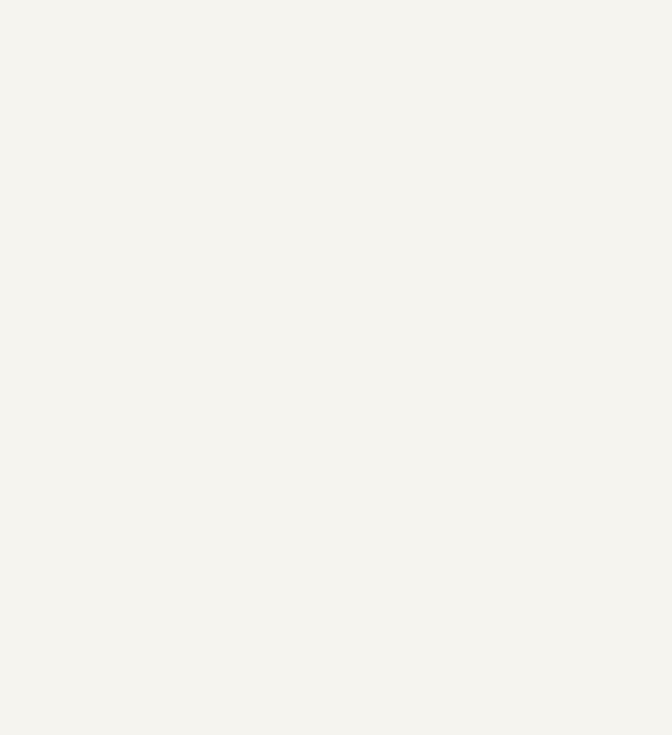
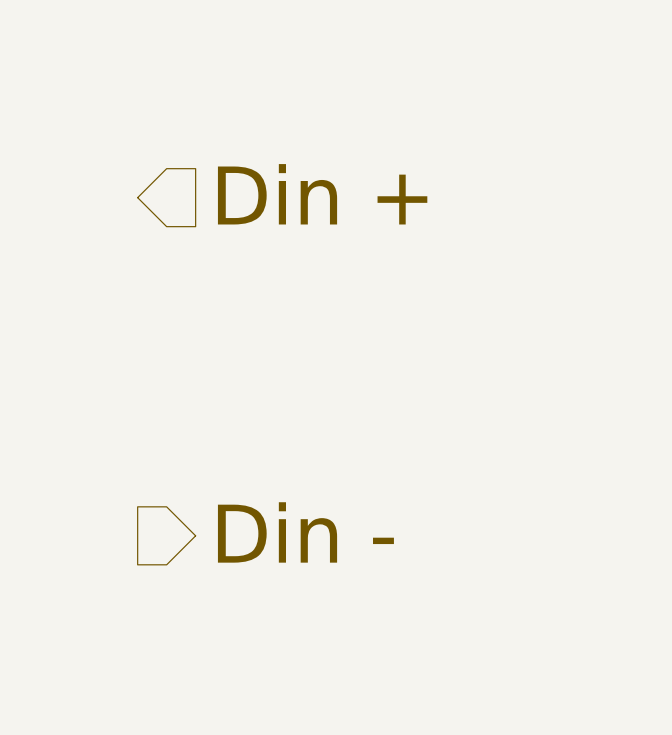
hierarchical label: none -> Din + (322, 194)
hierarchical label: none -> Din - (305, 532)

